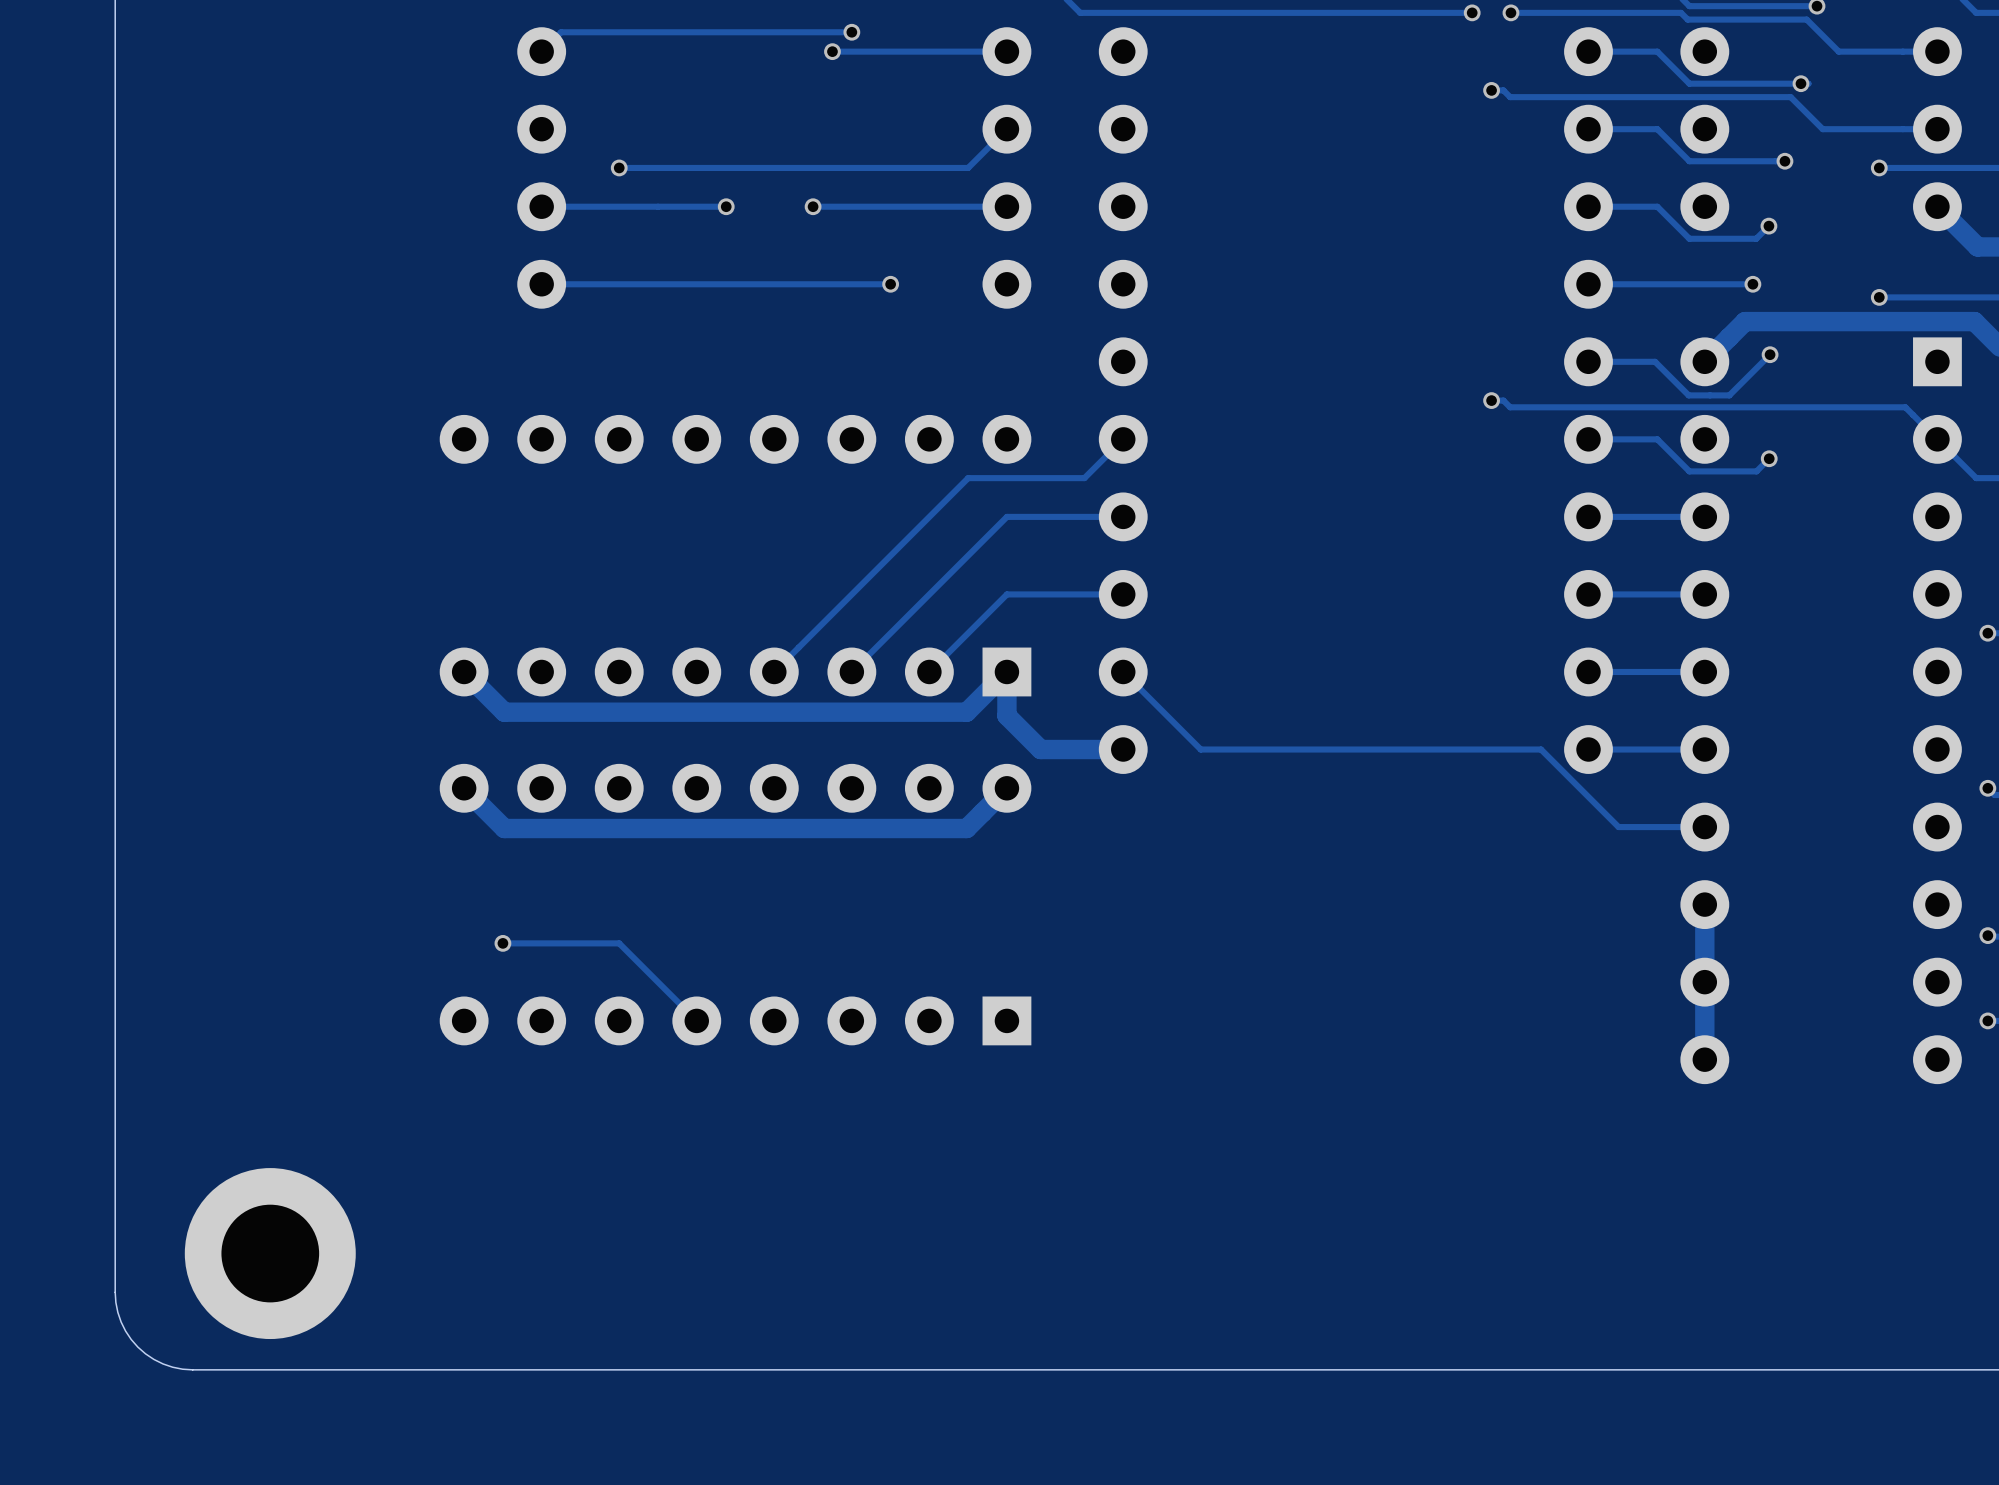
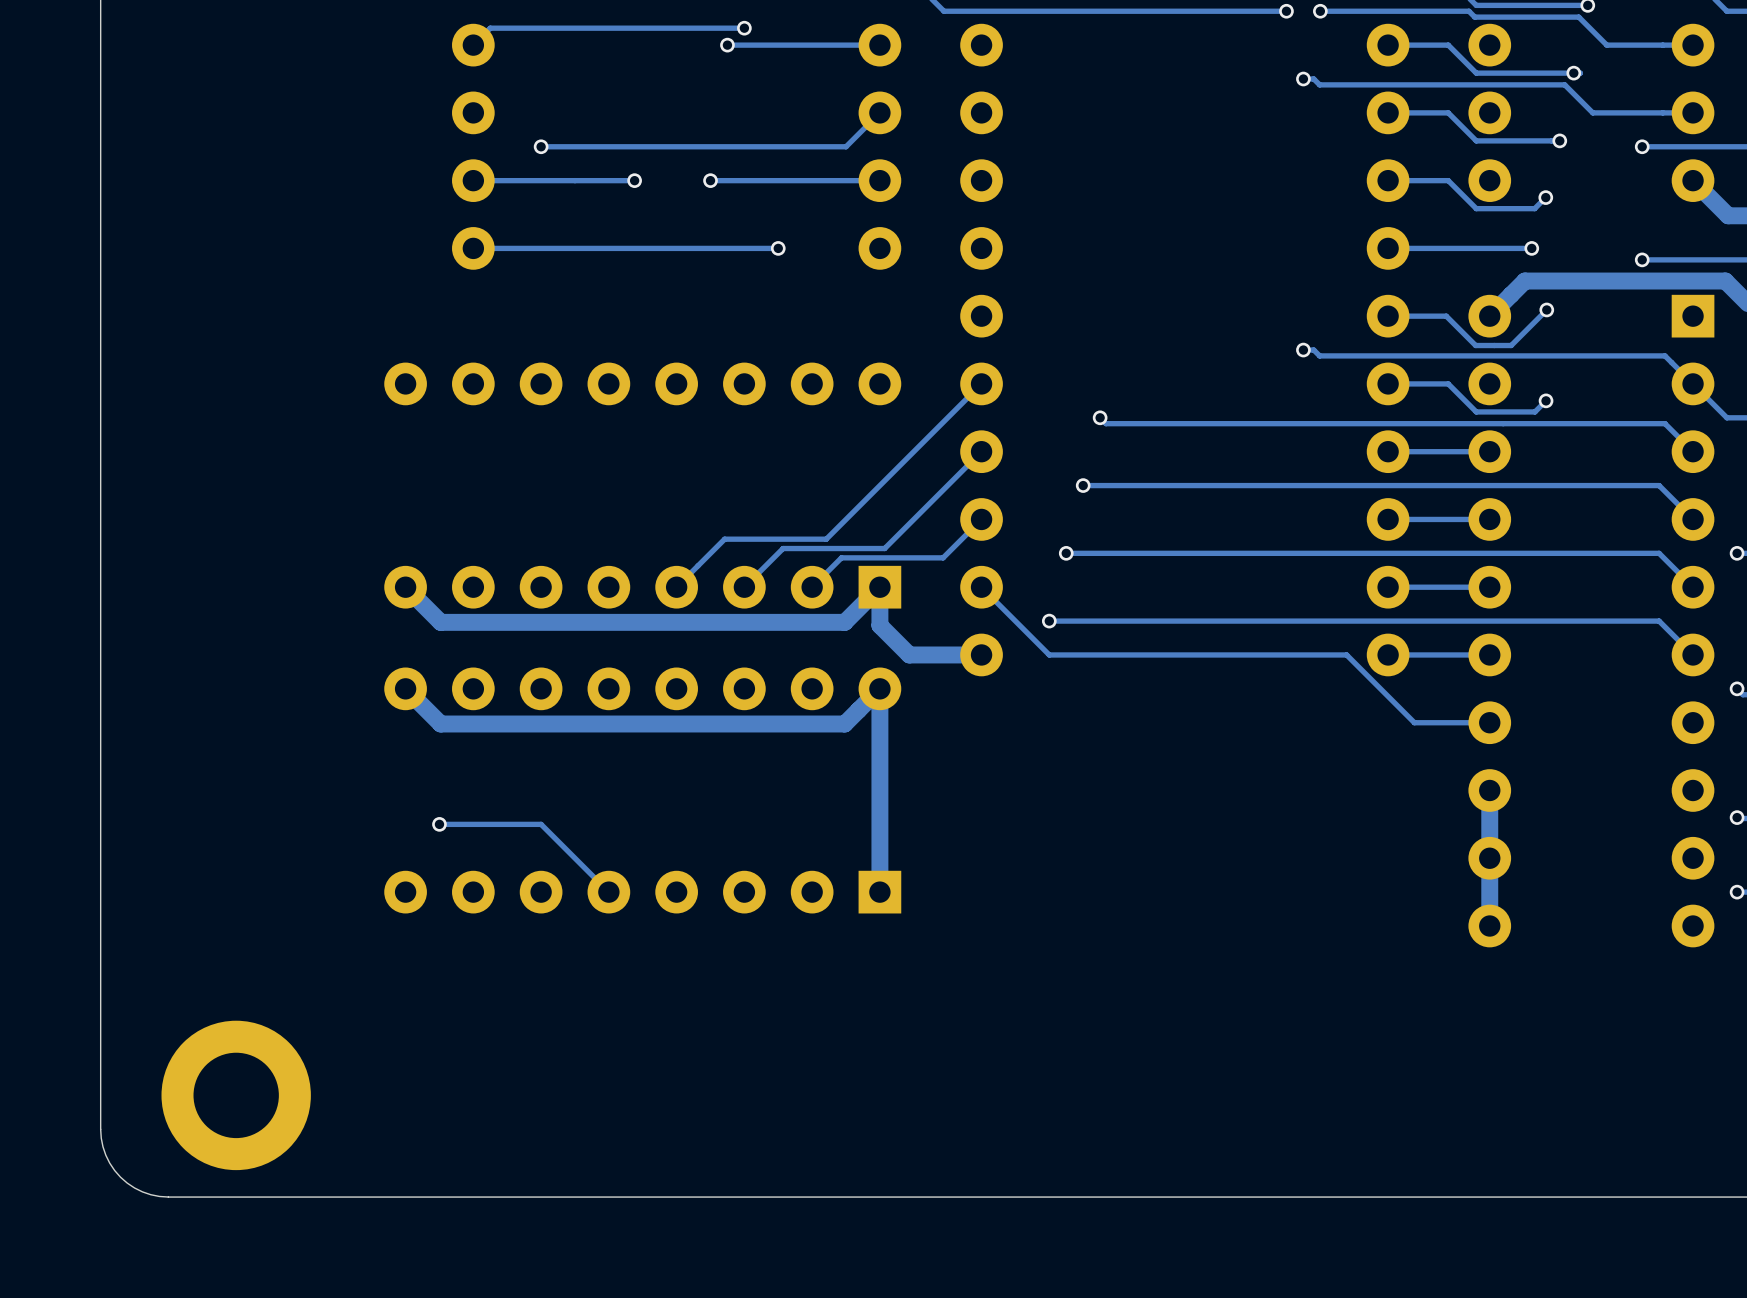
track: (1084, 478) (968, 478) (829, 617) -> (947, 417) (826, 539) (724, 539)
track: none -> (1100, 417) (1106, 423) (1665, 423) (1693, 451)
via: none -> (1100, 417)
track: (1123, 516) (1006, 516) (896, 627) -> (981, 451) (884, 548) (783, 548)
track: none -> (1083, 485) (1659, 485) (1693, 519)
via: none -> (1083, 485)
track: (1123, 594) (1006, 594) (962, 638) -> (981, 519) (943, 557) (841, 557)
track: none -> (1066, 553) (1659, 553) (1693, 587)
via: none -> (1066, 553)
track: none -> (1049, 621) (1659, 621) (1693, 654)
via: none -> (1049, 621)
track: none -> (879, 688) (879, 892)

